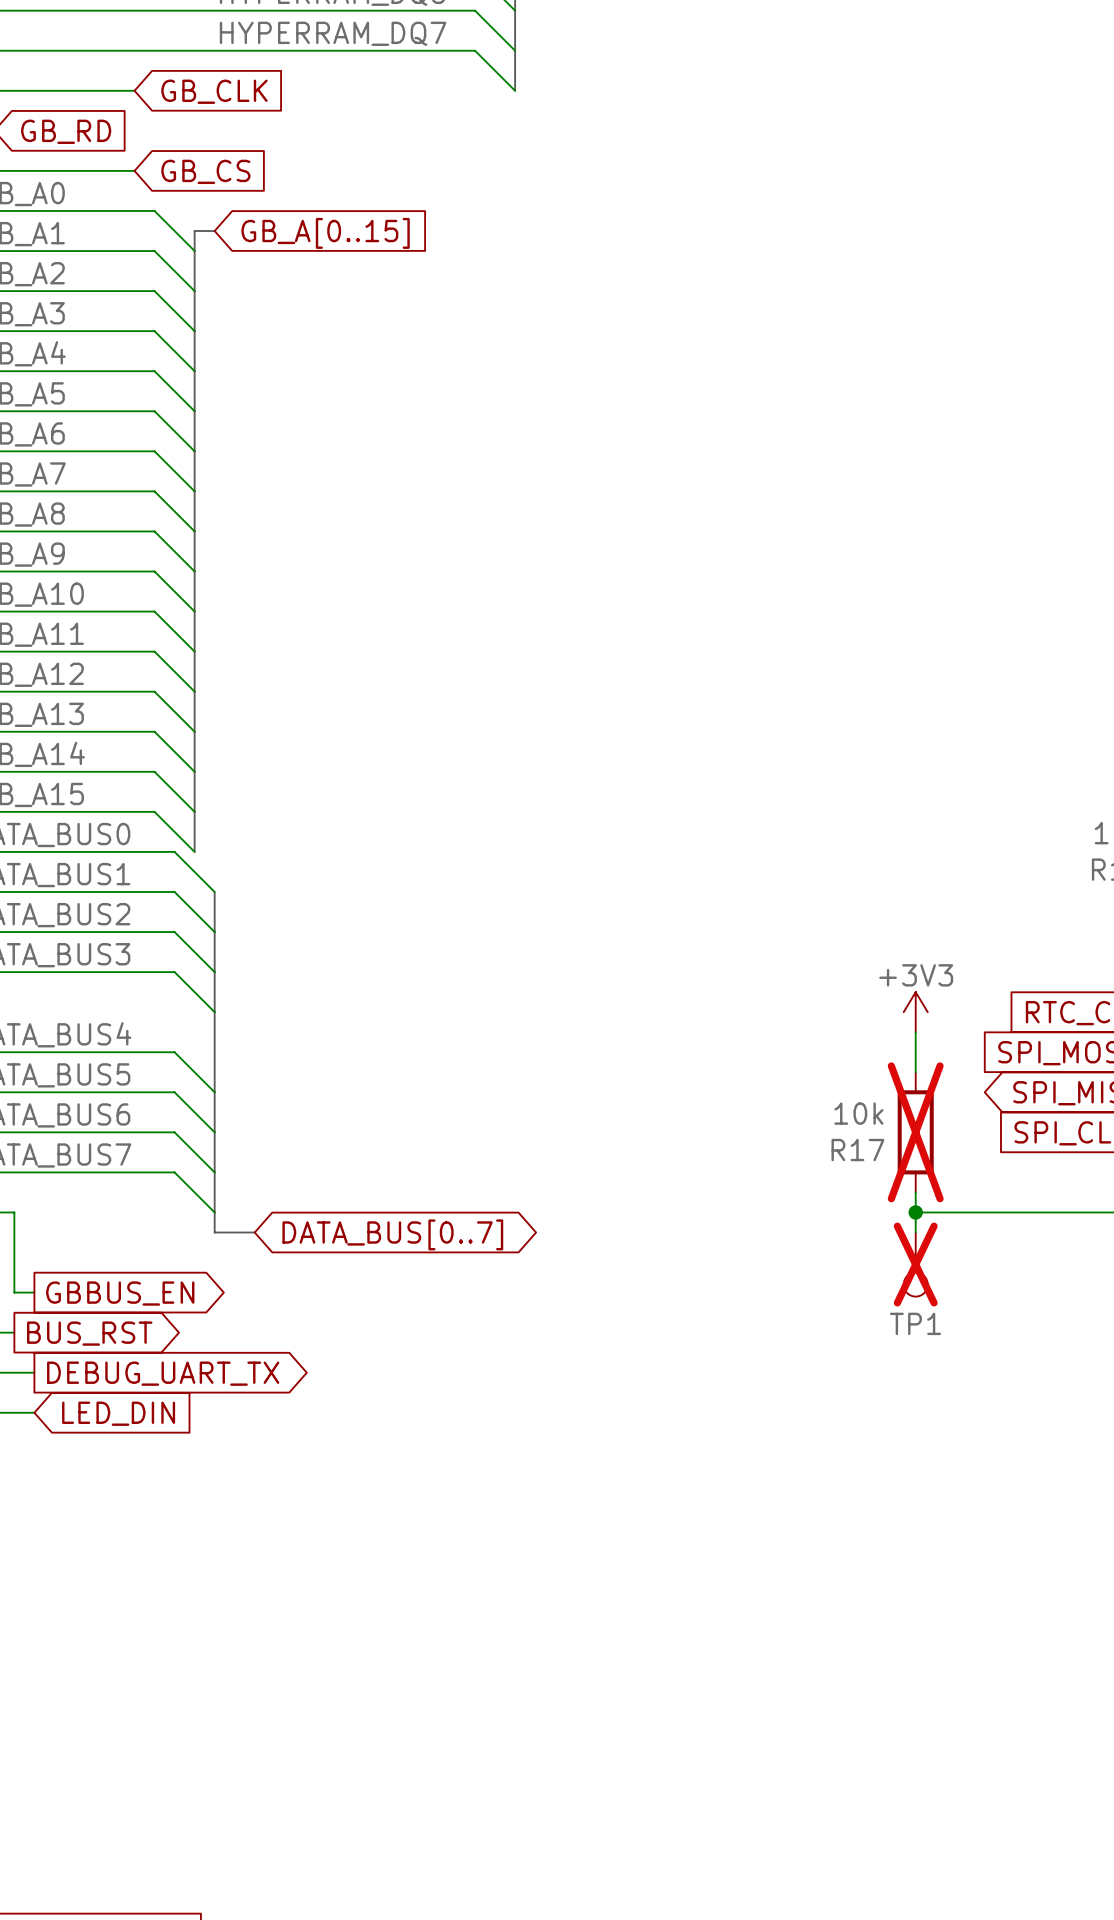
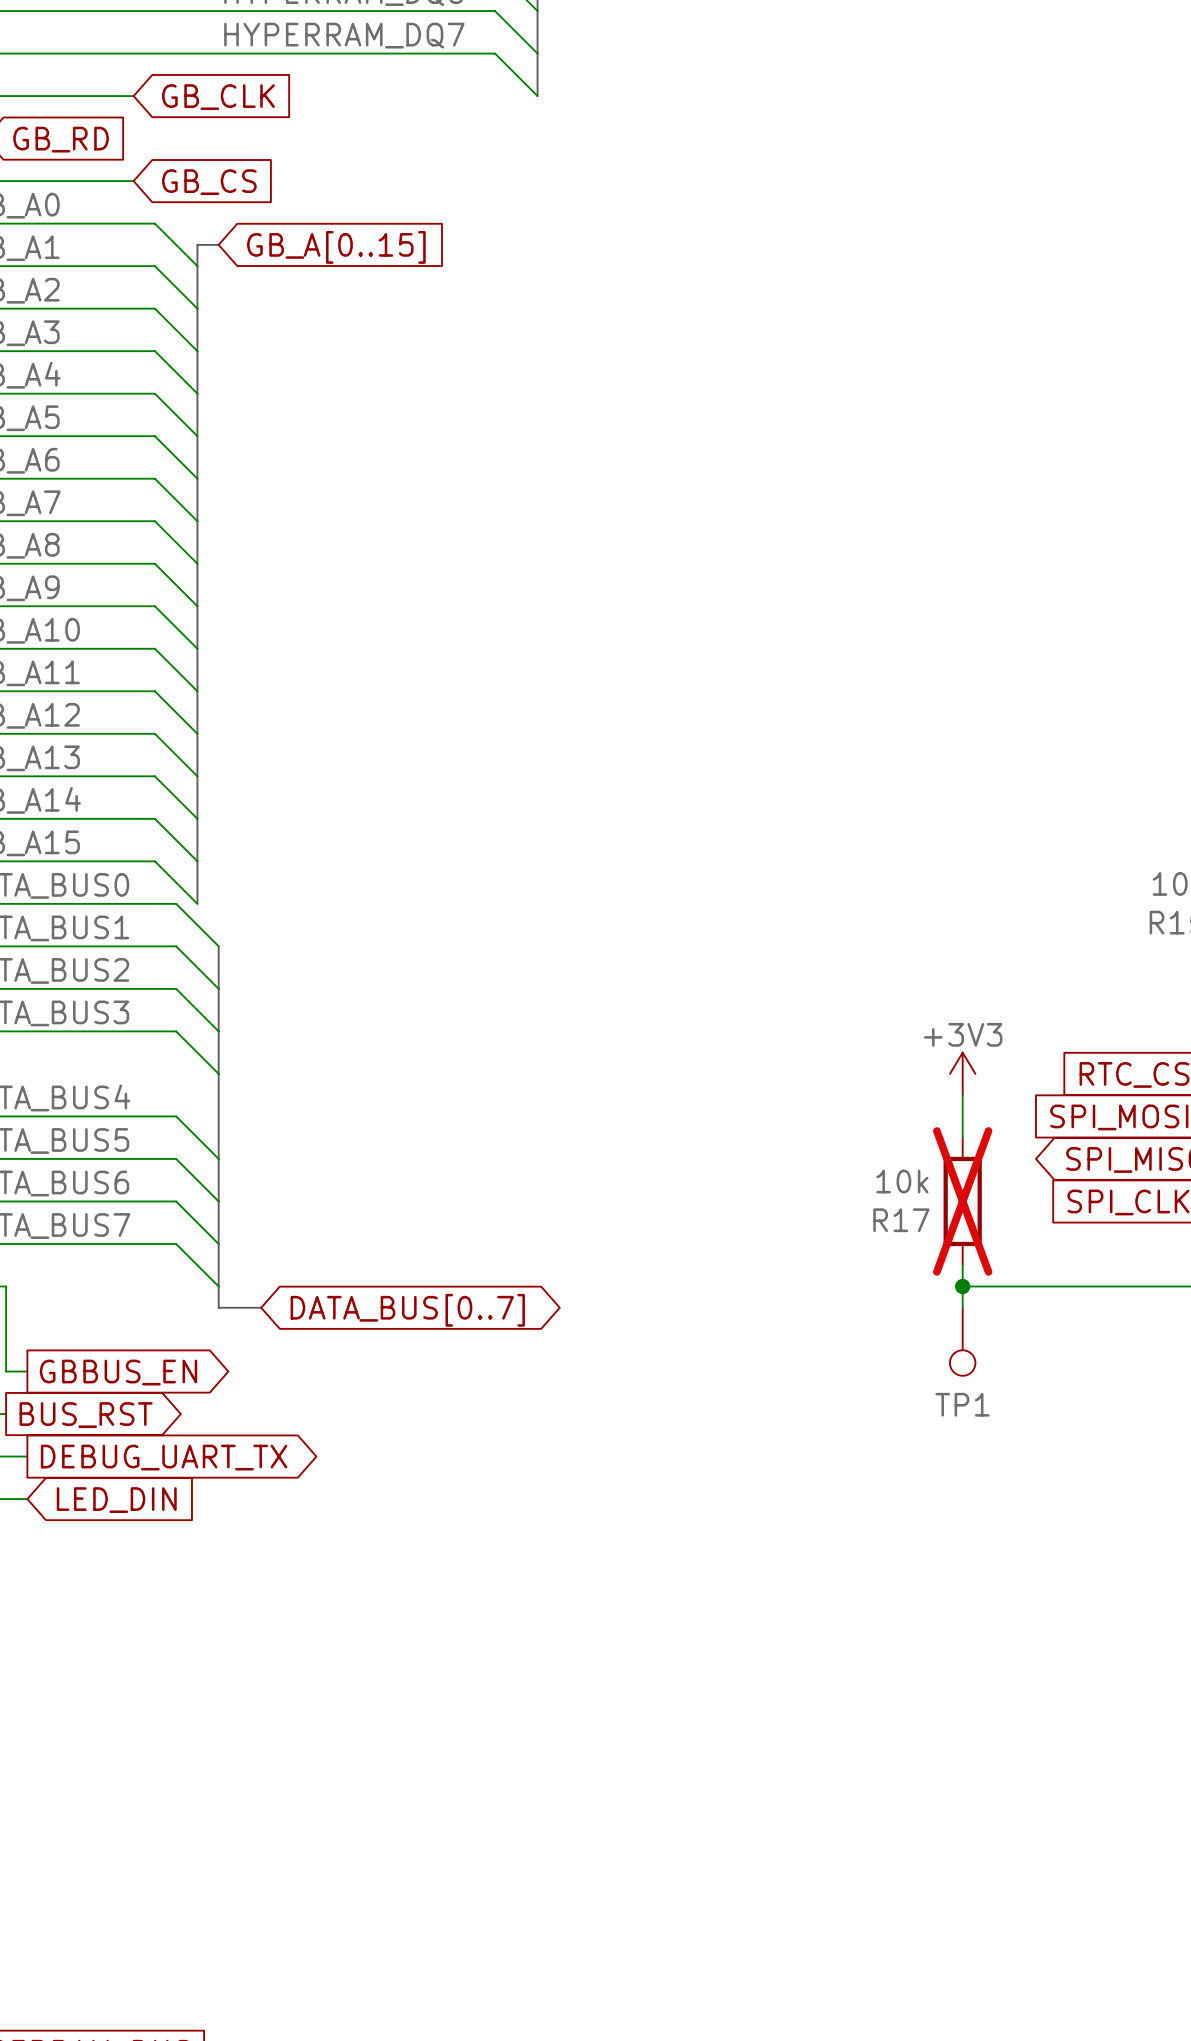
TP1 do-not-place cross: (915, 1264) -> none

